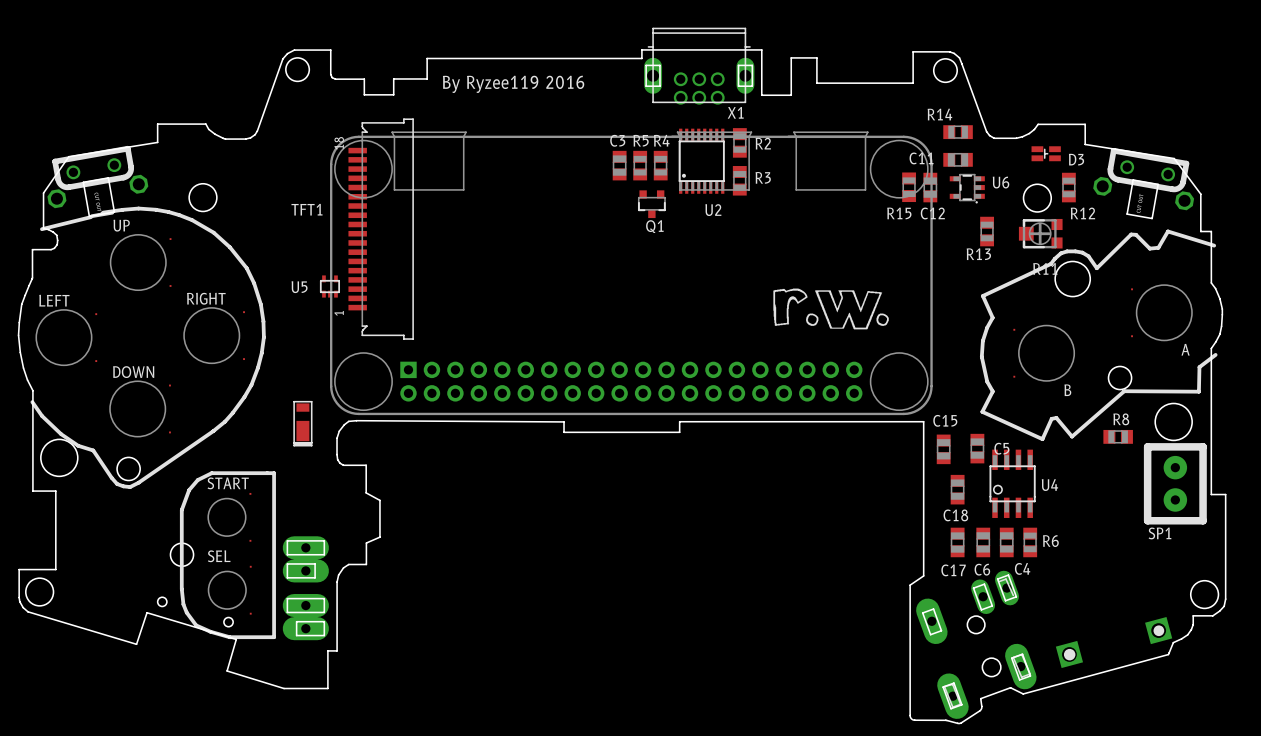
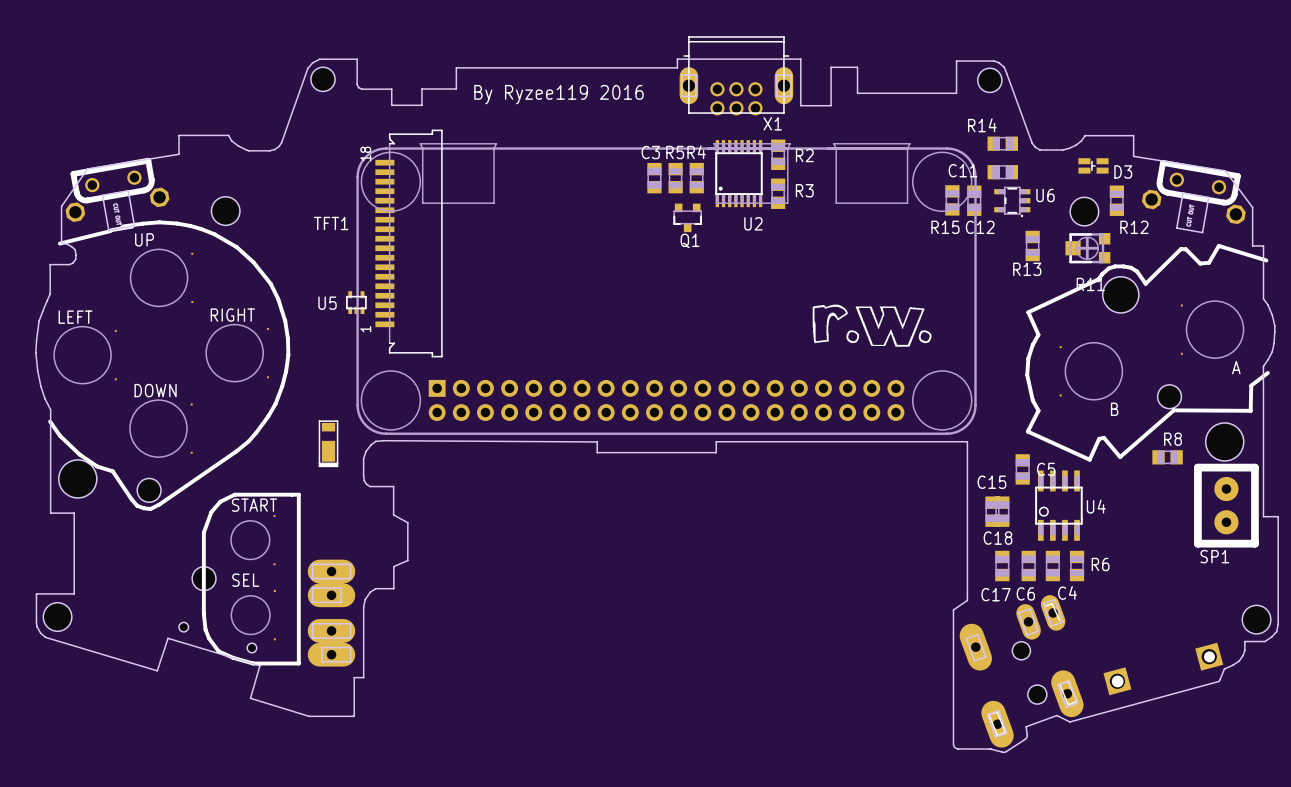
C15 position: (943, 449) -> (992, 511)

